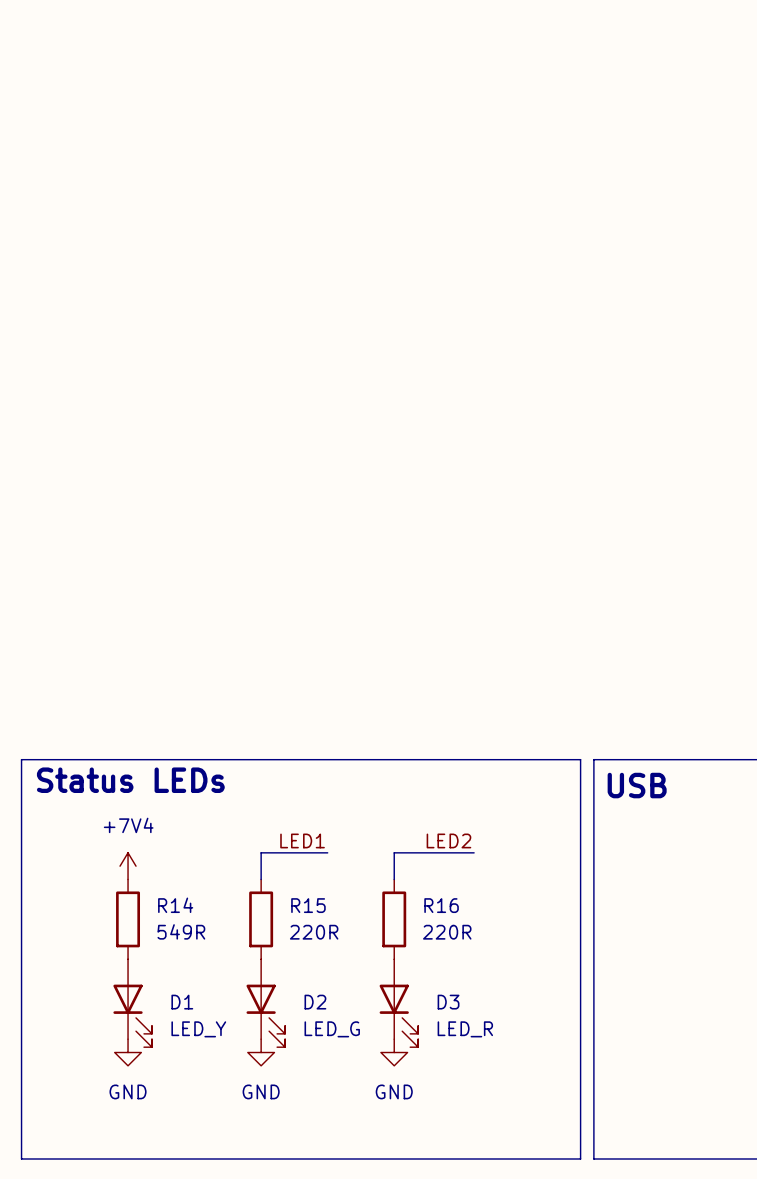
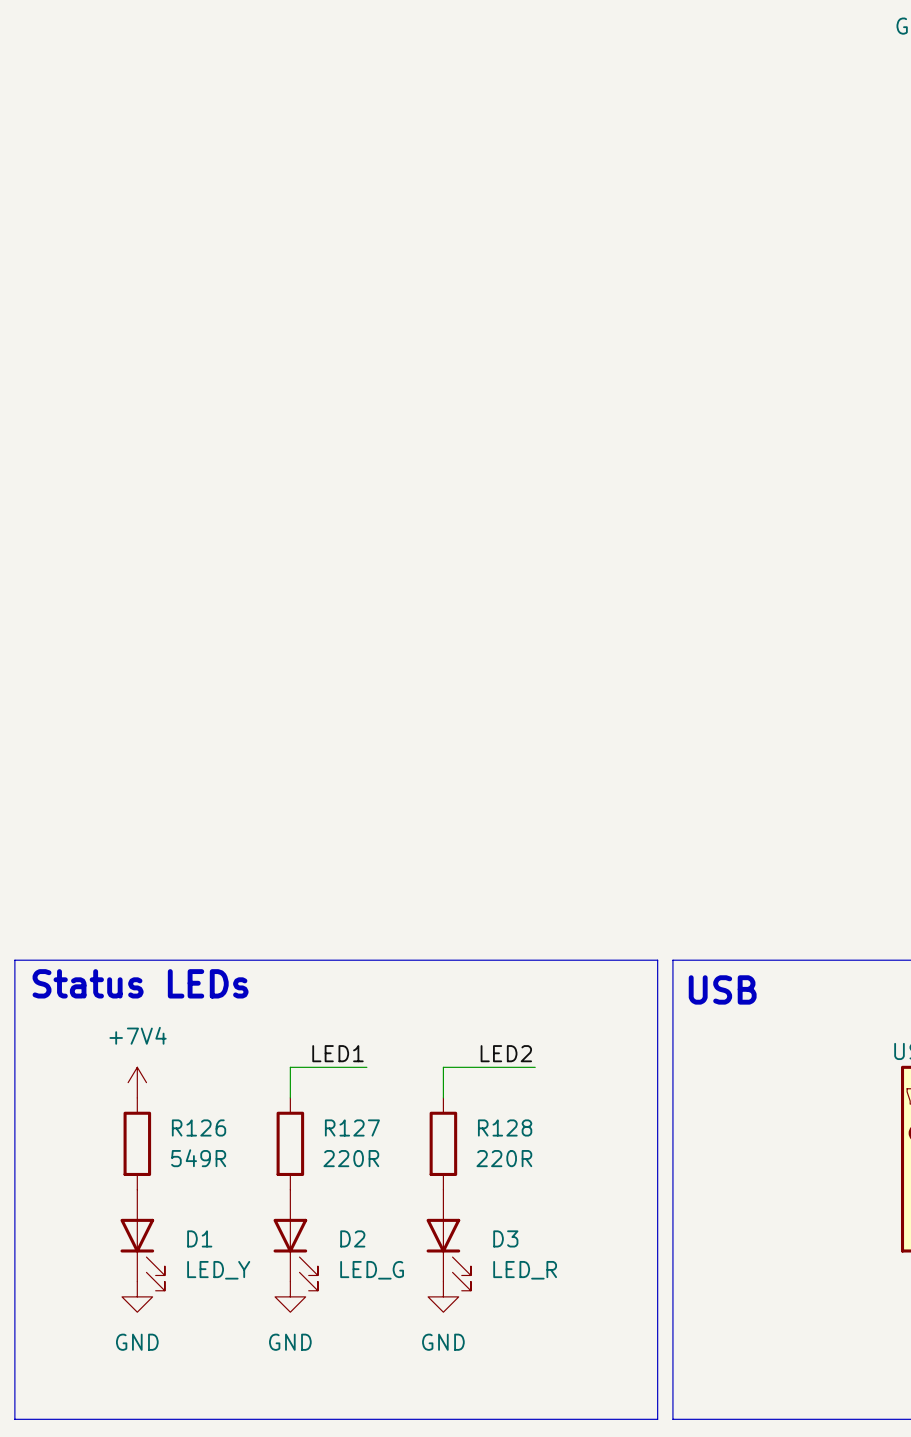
R14 name: R14 (175, 905) -> R126 (199, 1127)
R15 name: R15 (308, 905) -> R127 (352, 1127)
R16 name: R16 (441, 905) -> R128 (505, 1127)

